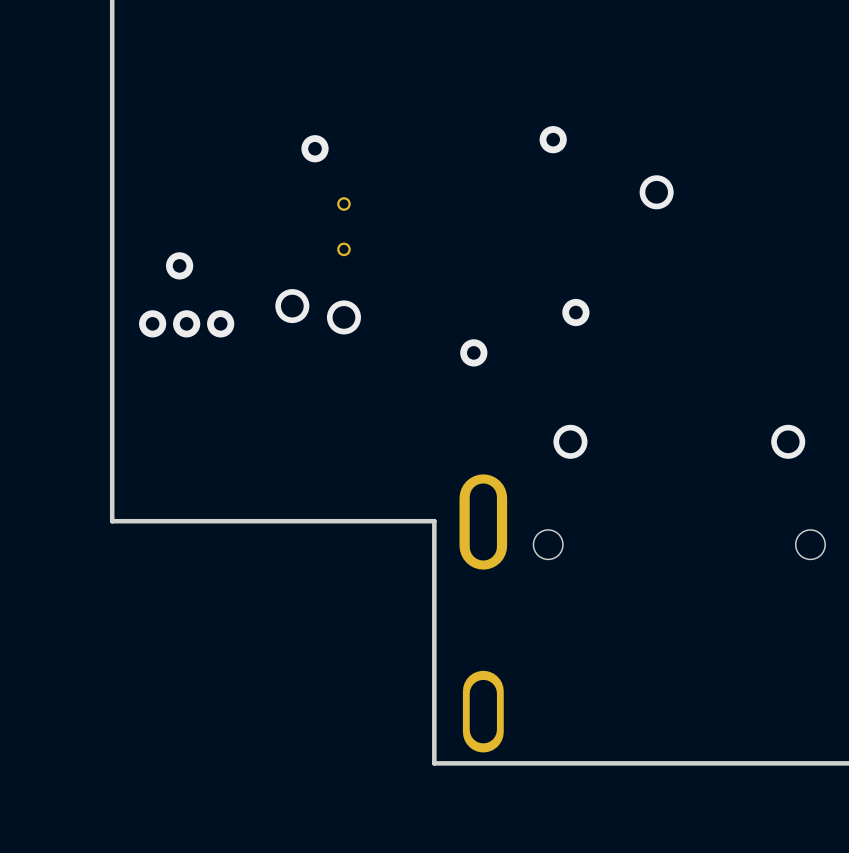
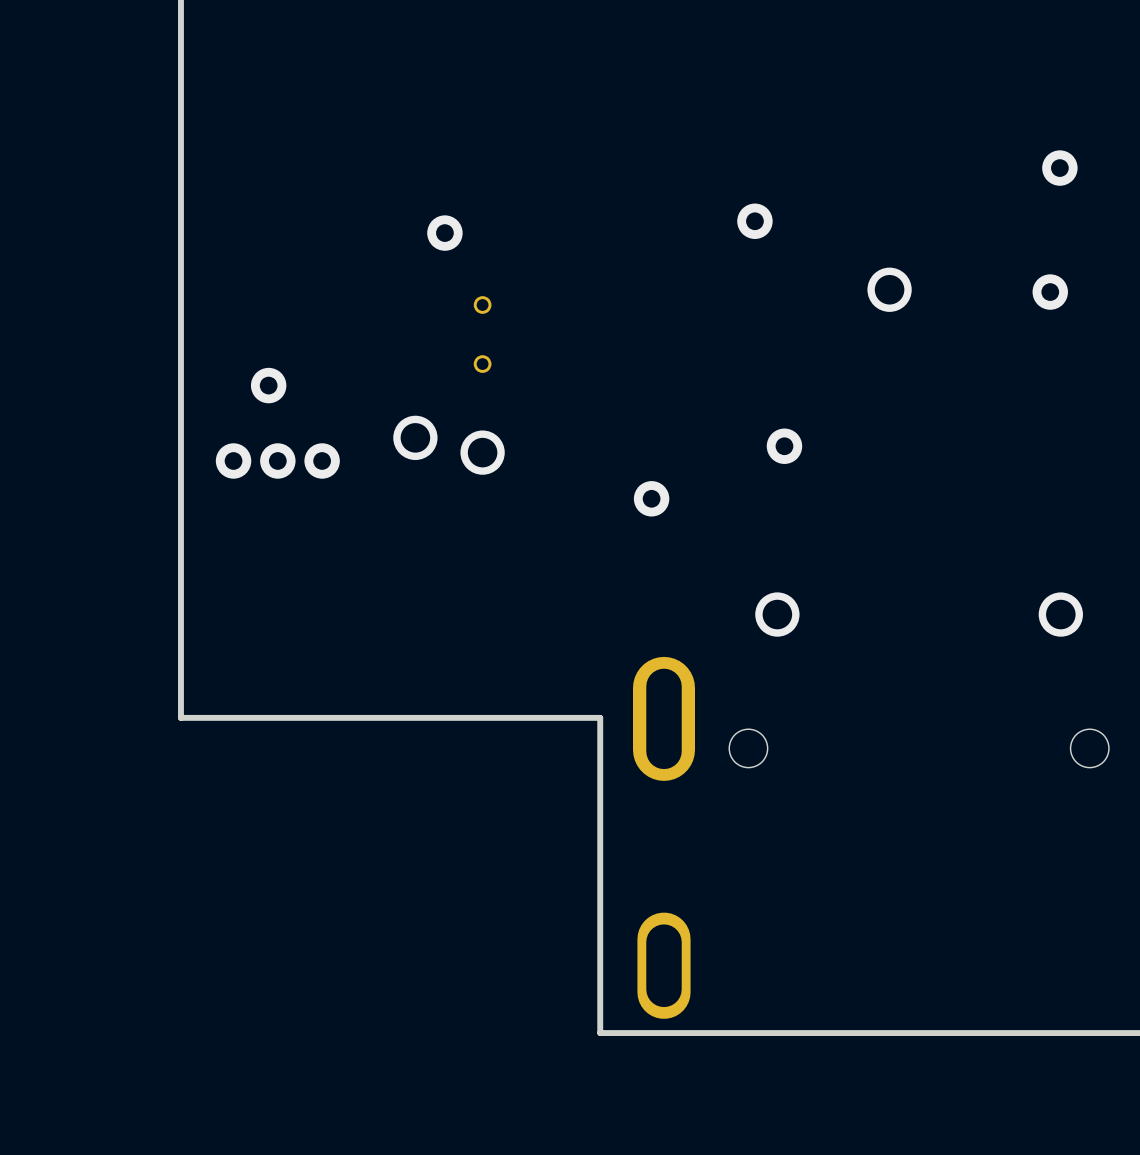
via: none -> (1059, 168)
via: none -> (1050, 292)

